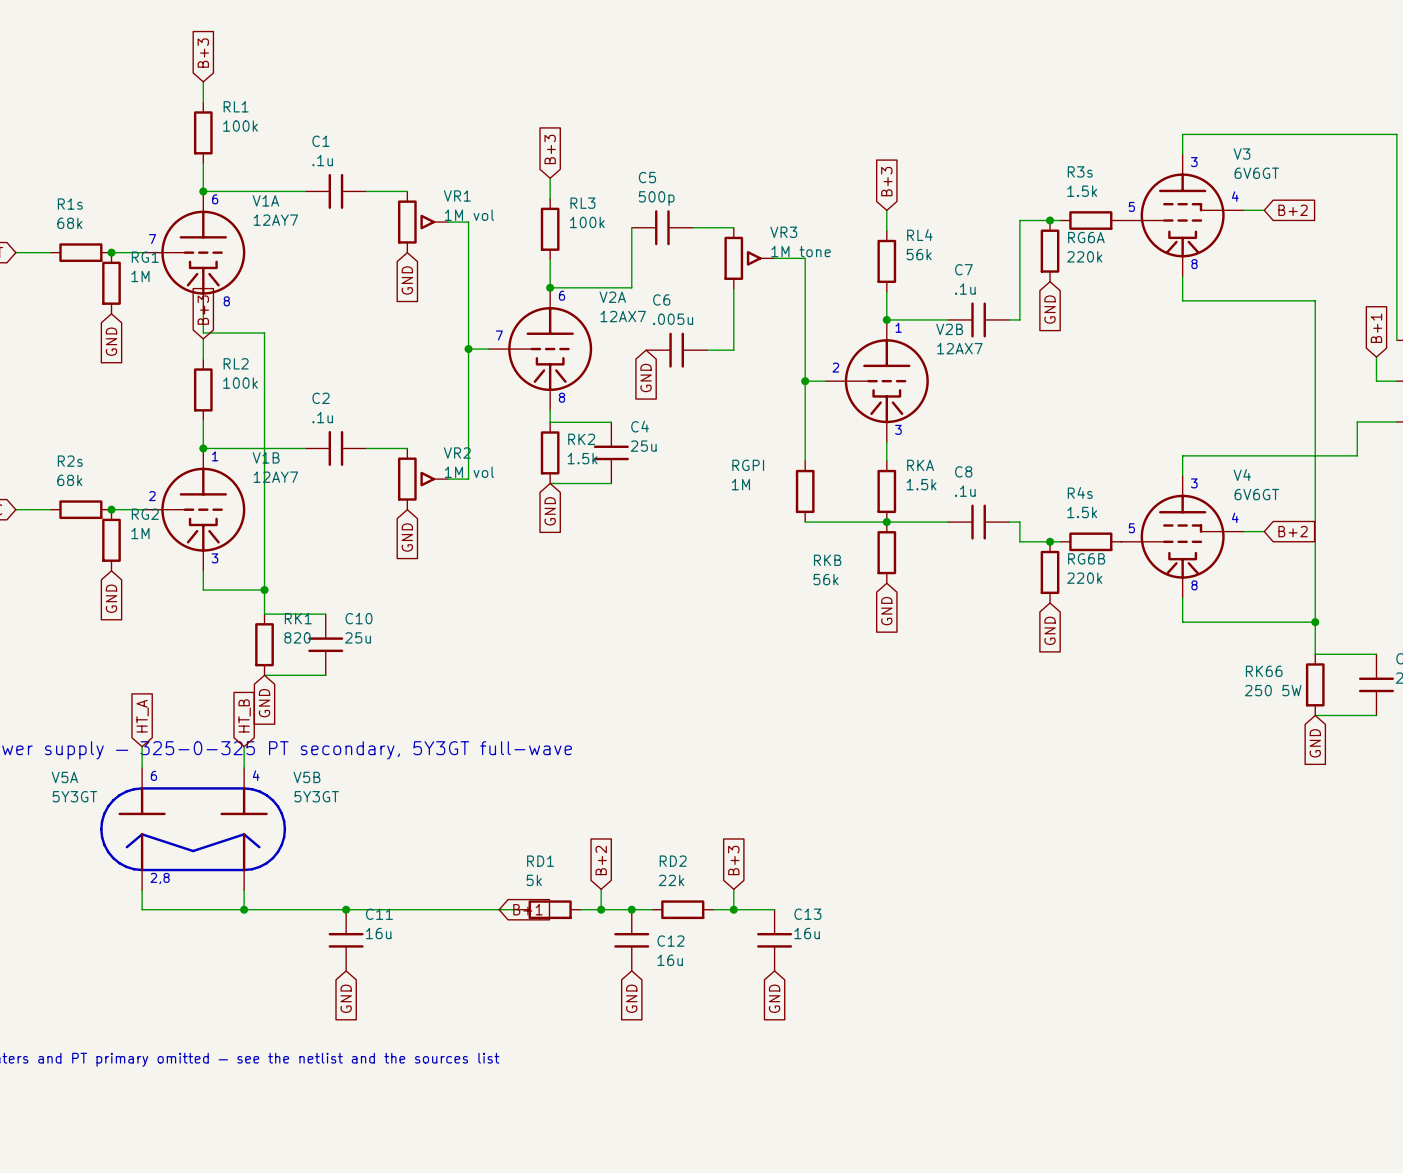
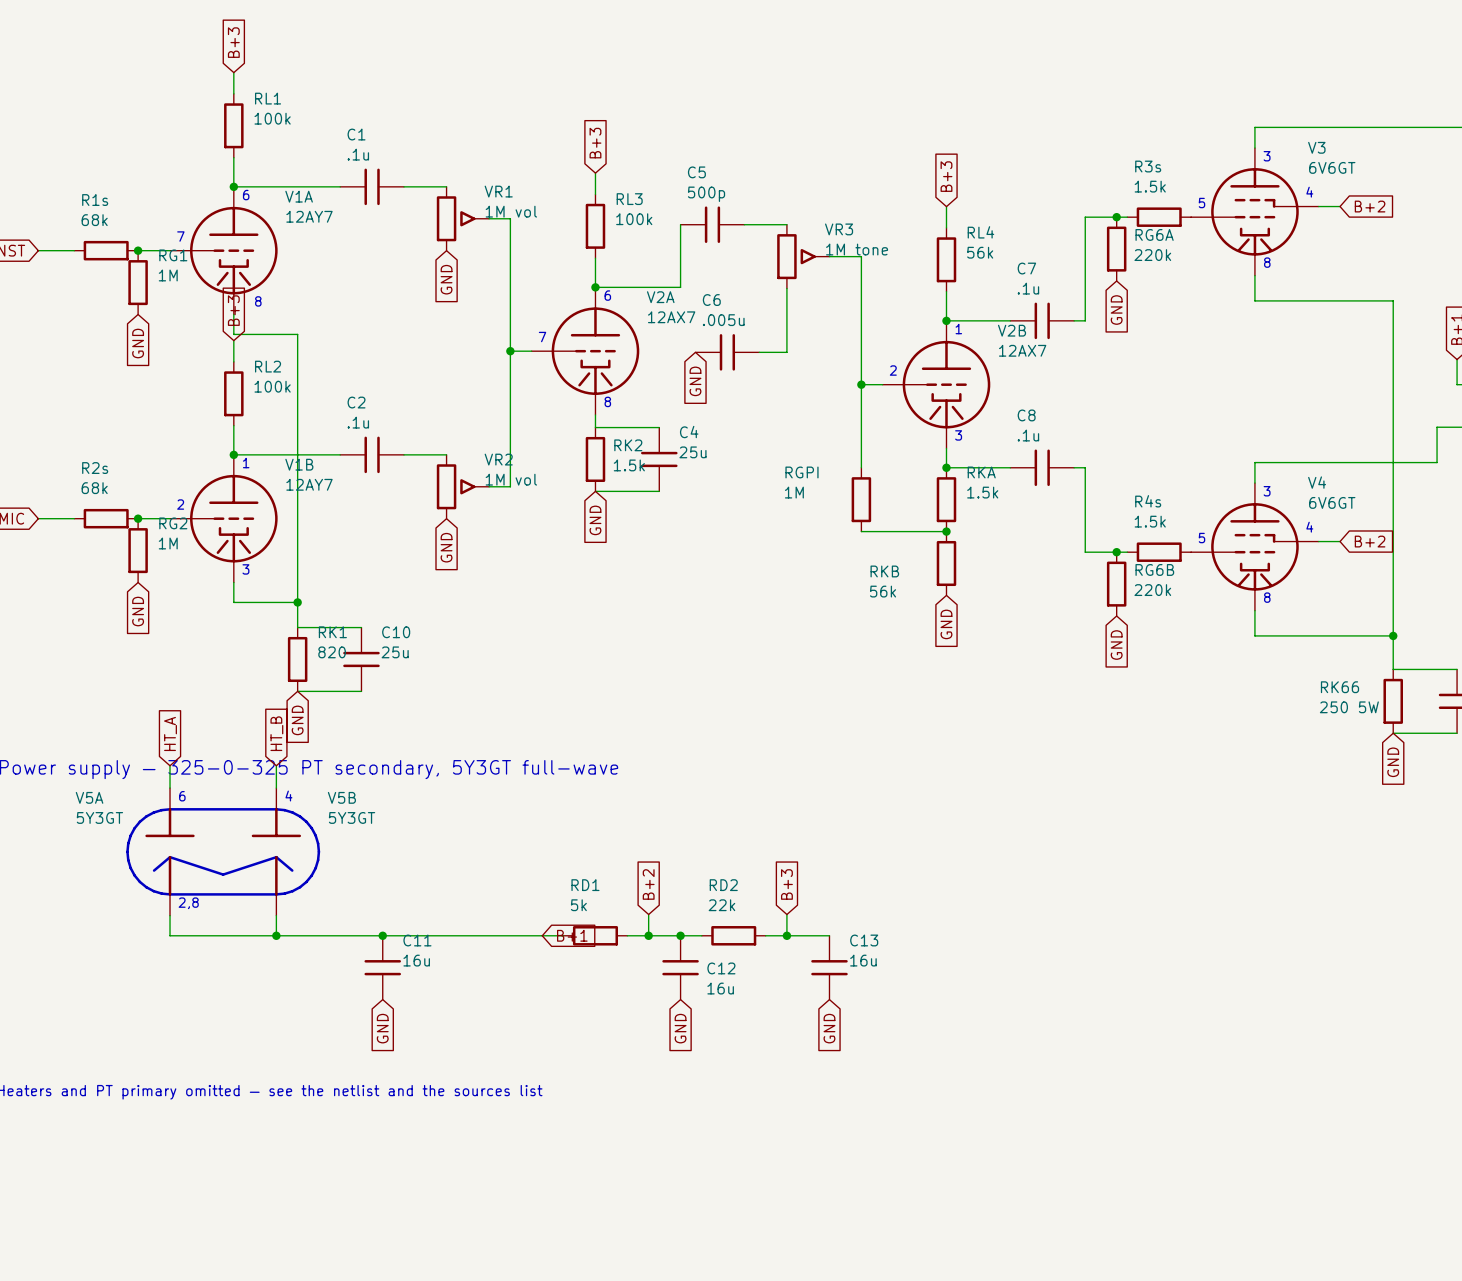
junction: none -> (946, 467)
wire: (886, 522) (948, 522) -> (946, 467) (1010, 467)
C8 position: (978, 522) -> (1042, 467)
wire: (1009, 522) (1019, 522) -> (1074, 467) (1085, 467) (1085, 531)

